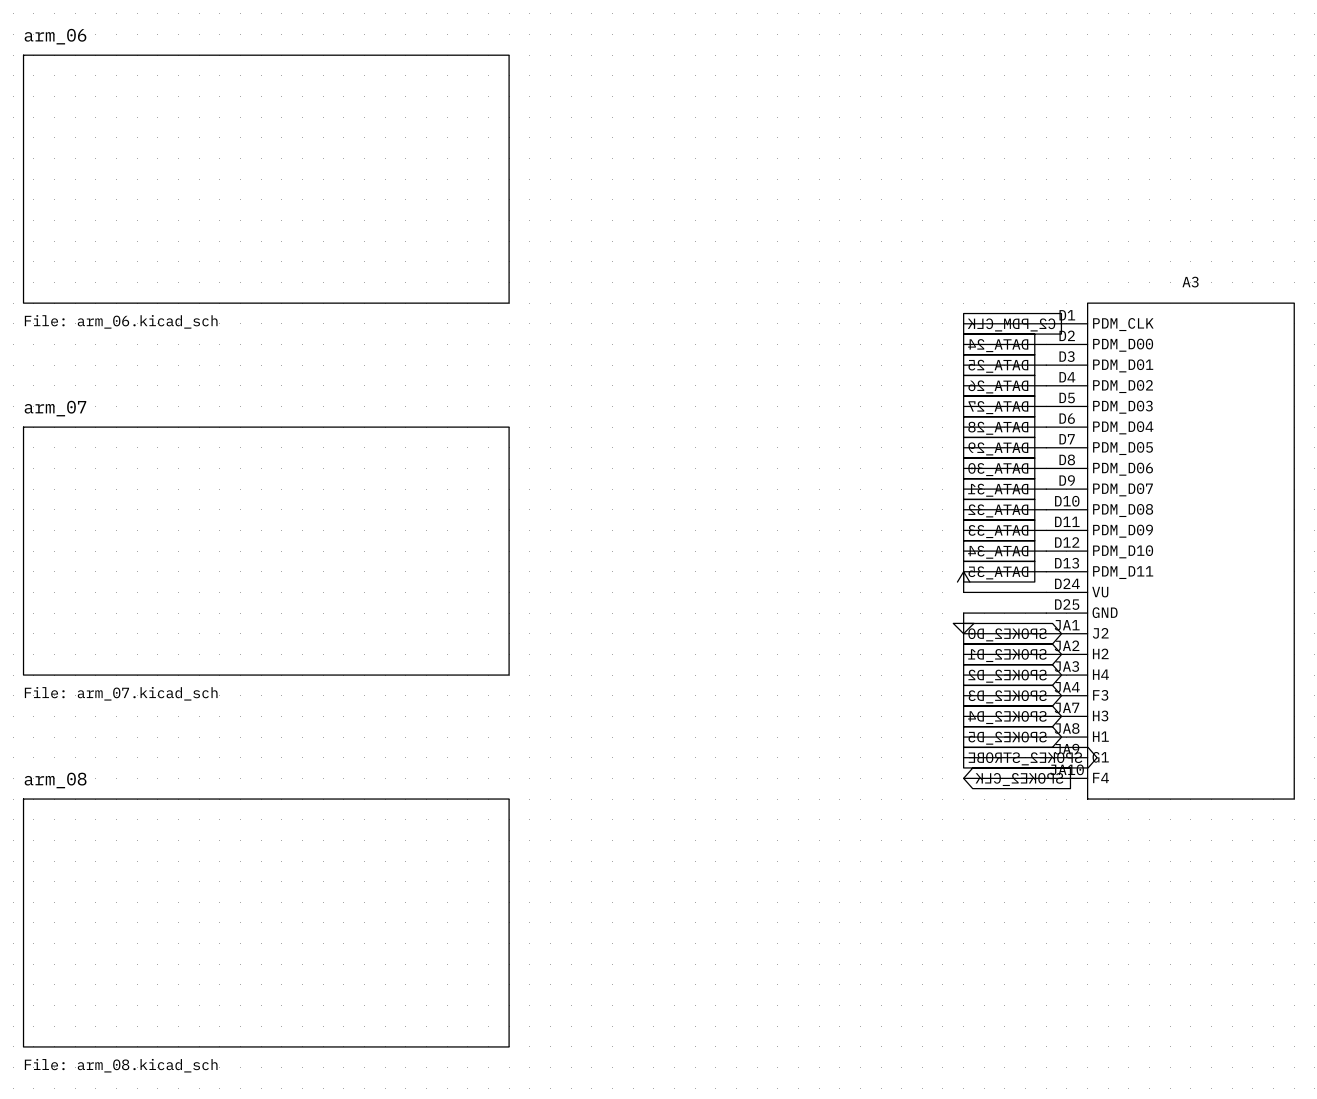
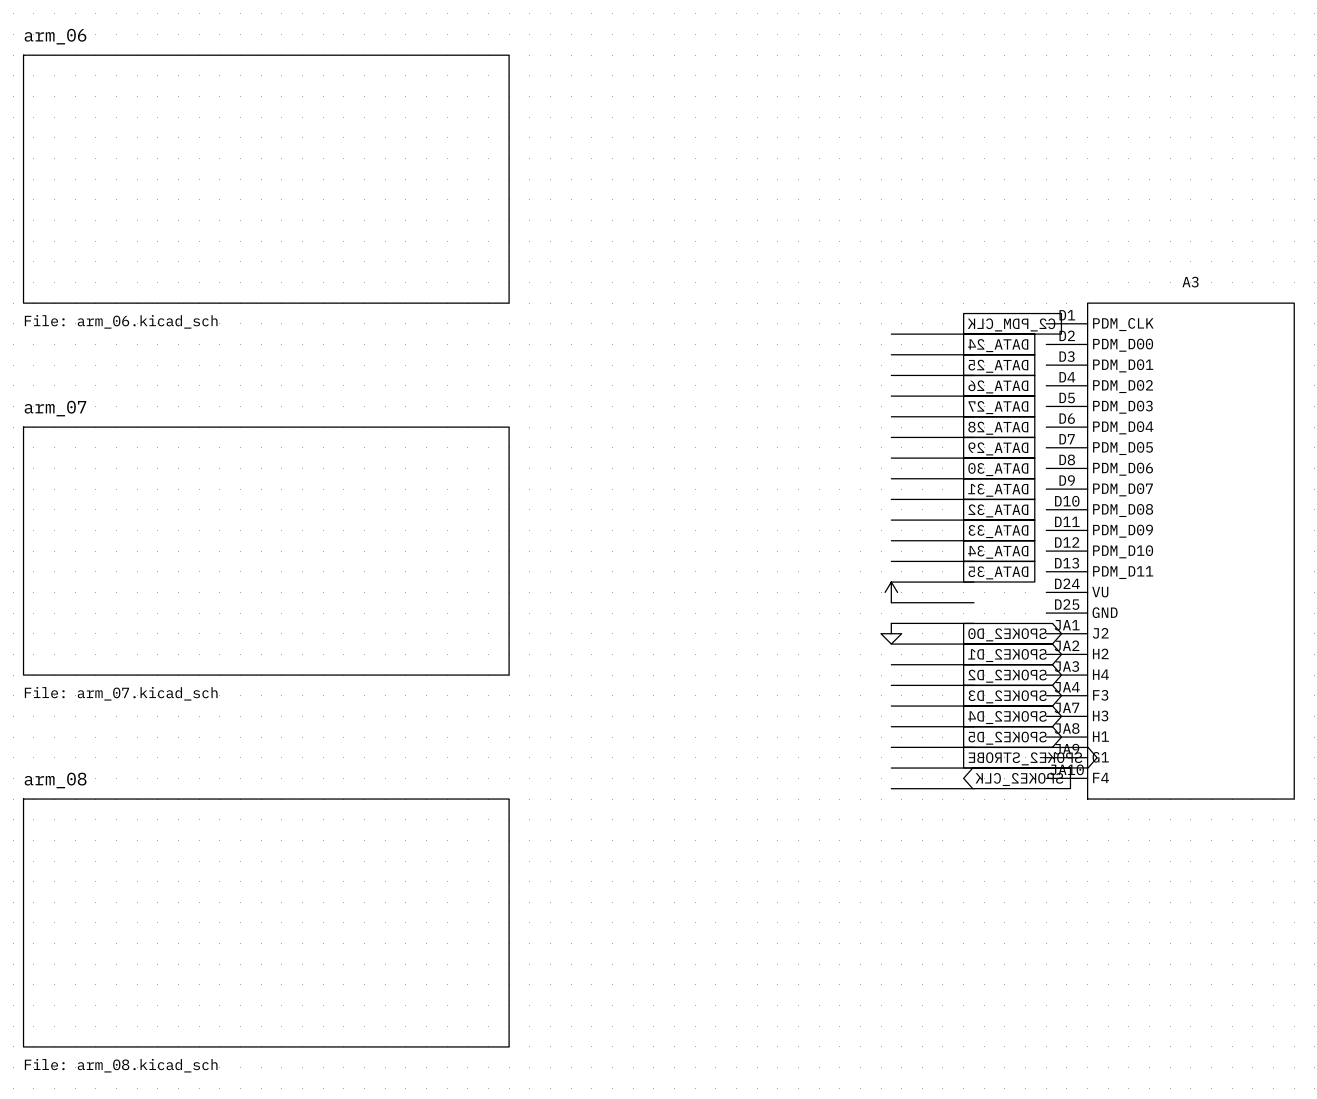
wire: (963, 323) (1046, 323) -> (891, 334) (973, 334)
wire: (963, 344) (1046, 344) -> (891, 354) (973, 354)
wire: (963, 365) (1046, 365) -> (891, 375) (973, 375)
wire: (963, 385) (1046, 385) -> (891, 396) (973, 396)
wire: (963, 406) (1046, 406) -> (891, 416) (973, 416)
wire: (963, 427) (1046, 427) -> (891, 437) (973, 437)
wire: (963, 447) (1046, 447) -> (891, 458) (973, 458)
wire: (963, 468) (1046, 468) -> (891, 478) (973, 478)
wire: (963, 489) (1046, 489) -> (891, 499) (973, 499)
wire: (963, 509) (1046, 509) -> (891, 520) (973, 520)
wire: (963, 530) (1046, 530) -> (891, 540) (973, 540)
wire: (963, 551) (1046, 551) -> (891, 561) (973, 561)
wire: (963, 571) (1046, 571) -> (891, 582) (973, 582)
power symbol position: (963, 582) -> (891, 592)
wire: (963, 592) (1046, 592) -> (891, 602) (973, 602)
wire: (963, 613) (1046, 613) -> (891, 623) (973, 623)
power symbol position: (963, 623) -> (891, 633)
wire: (963, 633) (1046, 633) -> (891, 644) (973, 644)
wire: (963, 654) (1046, 654) -> (891, 664) (973, 664)
wire: (963, 675) (1046, 675) -> (891, 685) (973, 685)
wire: (963, 695) (1046, 695) -> (891, 706) (973, 706)
wire: (963, 716) (1046, 716) -> (891, 726) (973, 726)
wire: (963, 737) (1046, 737) -> (891, 747) (973, 747)
wire: (963, 757) (1046, 757) -> (891, 768) (973, 768)
wire: (963, 778) (1046, 778) -> (891, 788) (973, 788)

